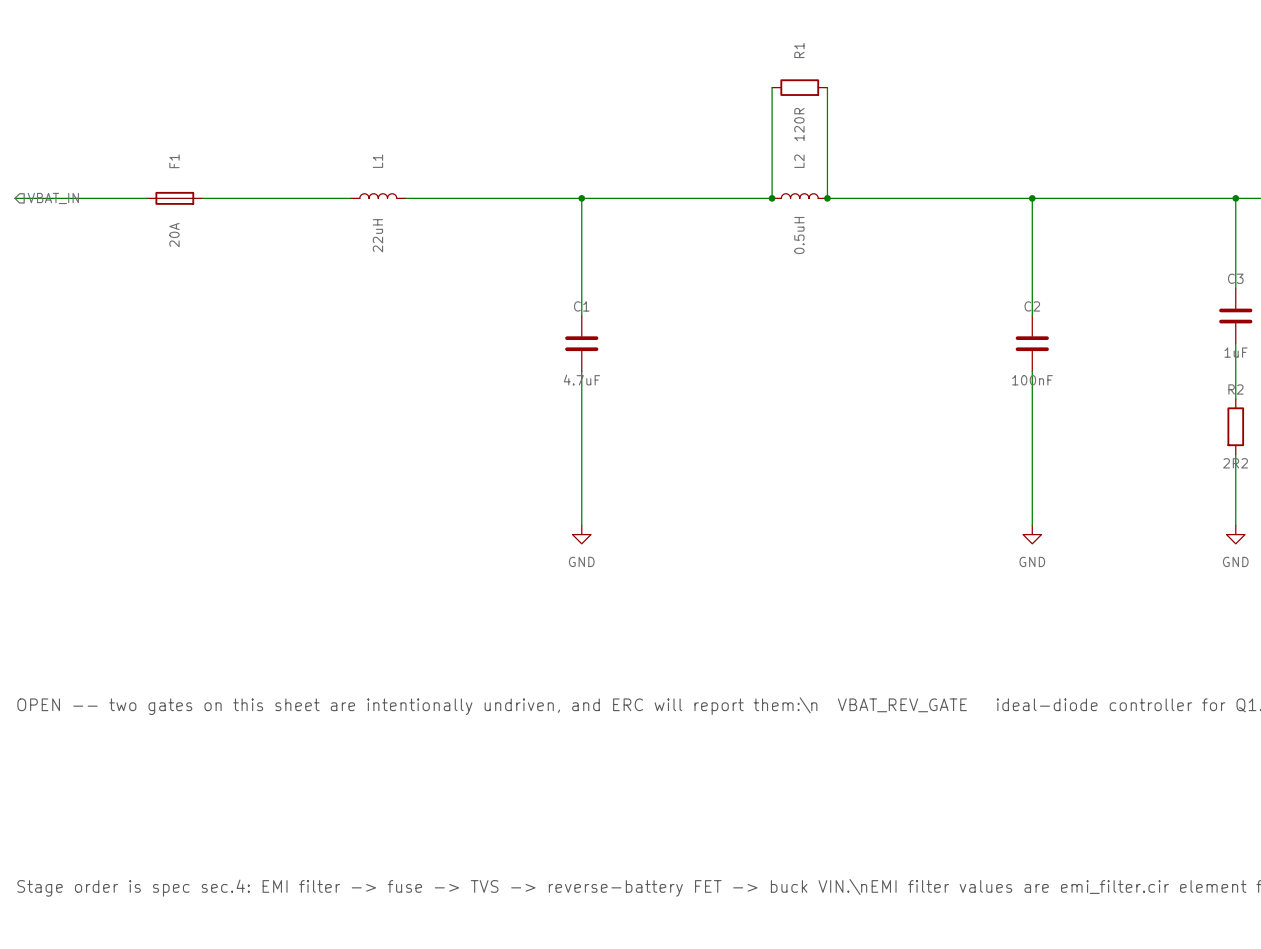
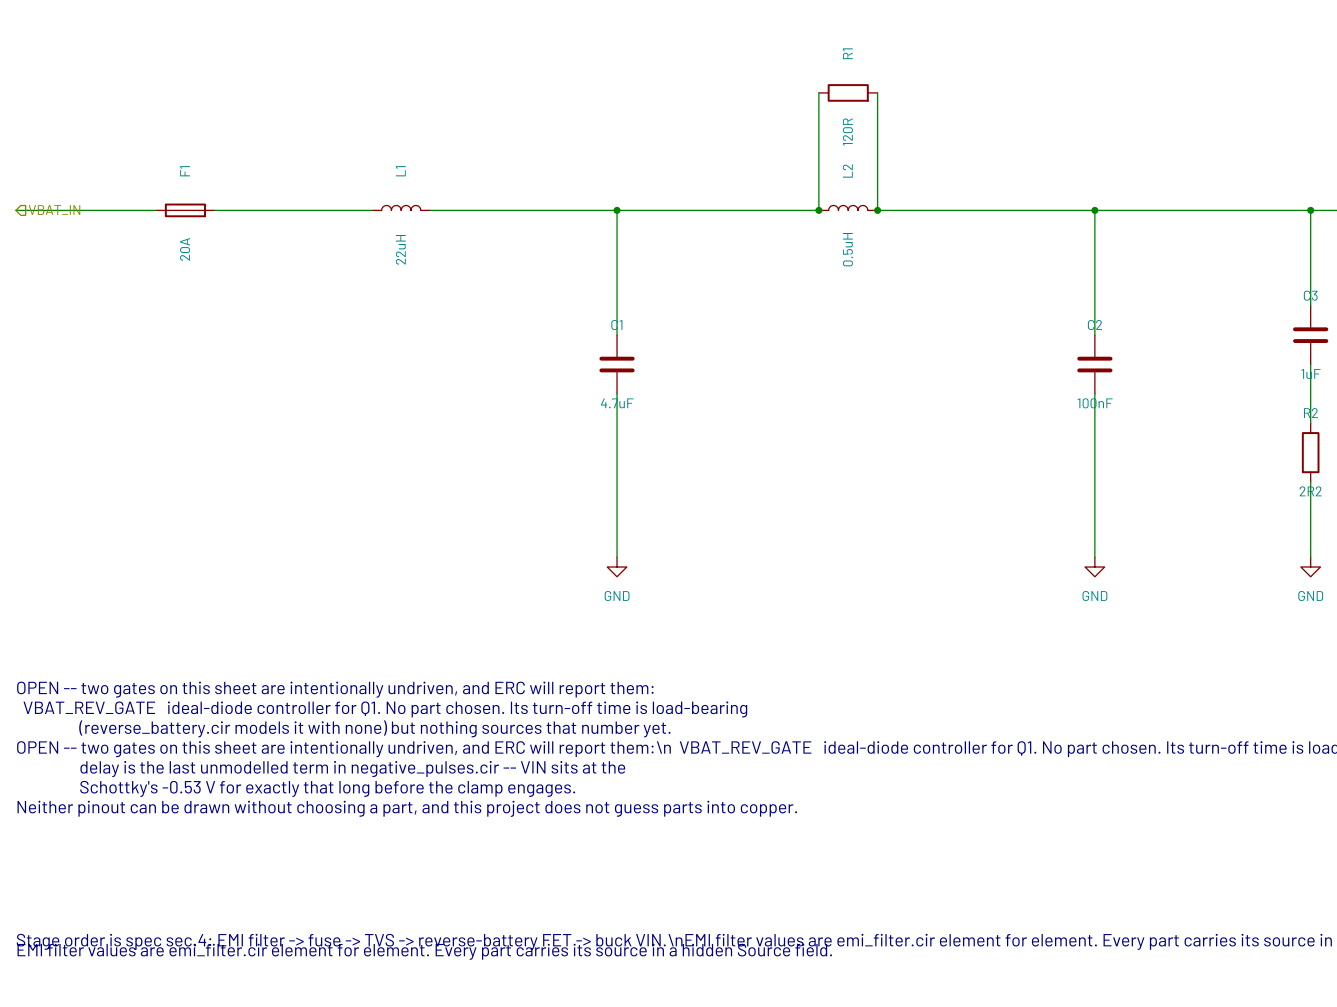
text: none -> OPEN -- two gates on this sheet are intentionally undriven, and ERC will report them: (335, 689)
text: none -> VBAT_REV_GATE ideal-diode controller for Q1. No part chosen. Its turn-off time is load-bearing (385, 709)
text: none -> (reverse_battery.cir models it with none) but nothing sources that number yet. (374, 728)
text: none -> delay is the last unmodelled term in negative_pulses.cir -- VIN sits at the (352, 769)
text: none -> Schottky's -0.53 V for exactly that long before the clamp engages. (327, 788)
text: none -> Neither pinout can be drawn without choosing a part, and this project does not guess parts into copper. (407, 808)
text: none -> EMI filter values are emi_filter.cir element for element. Every part carries its source in a hidden Source field. (424, 951)

